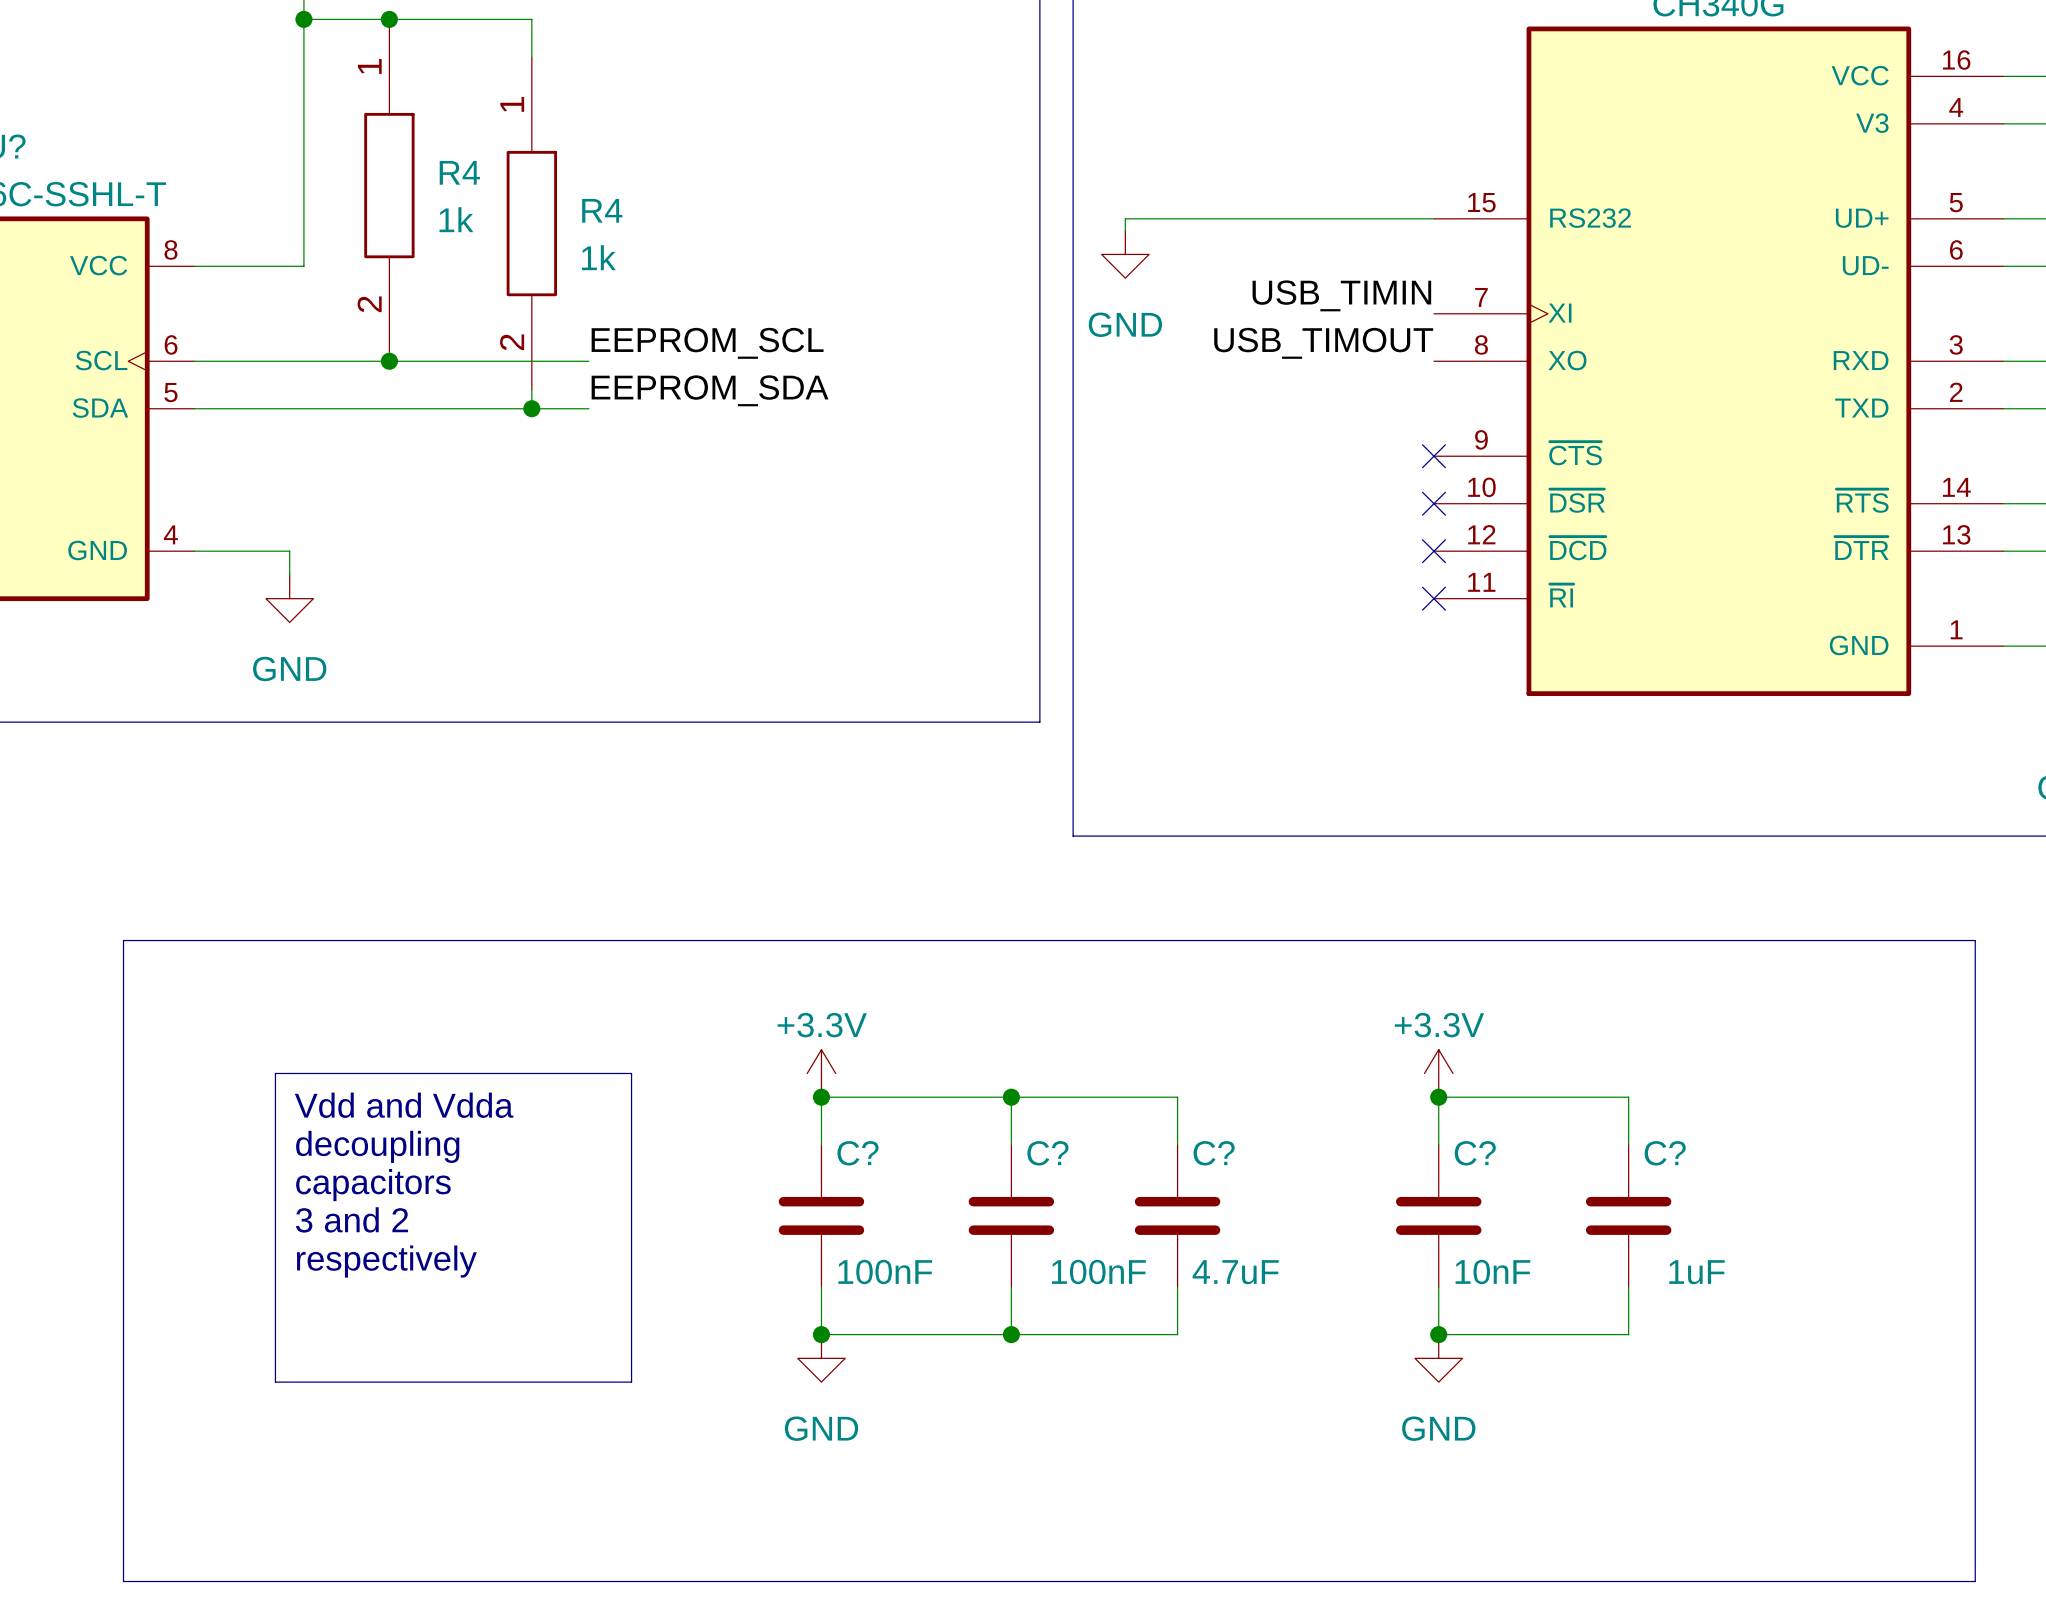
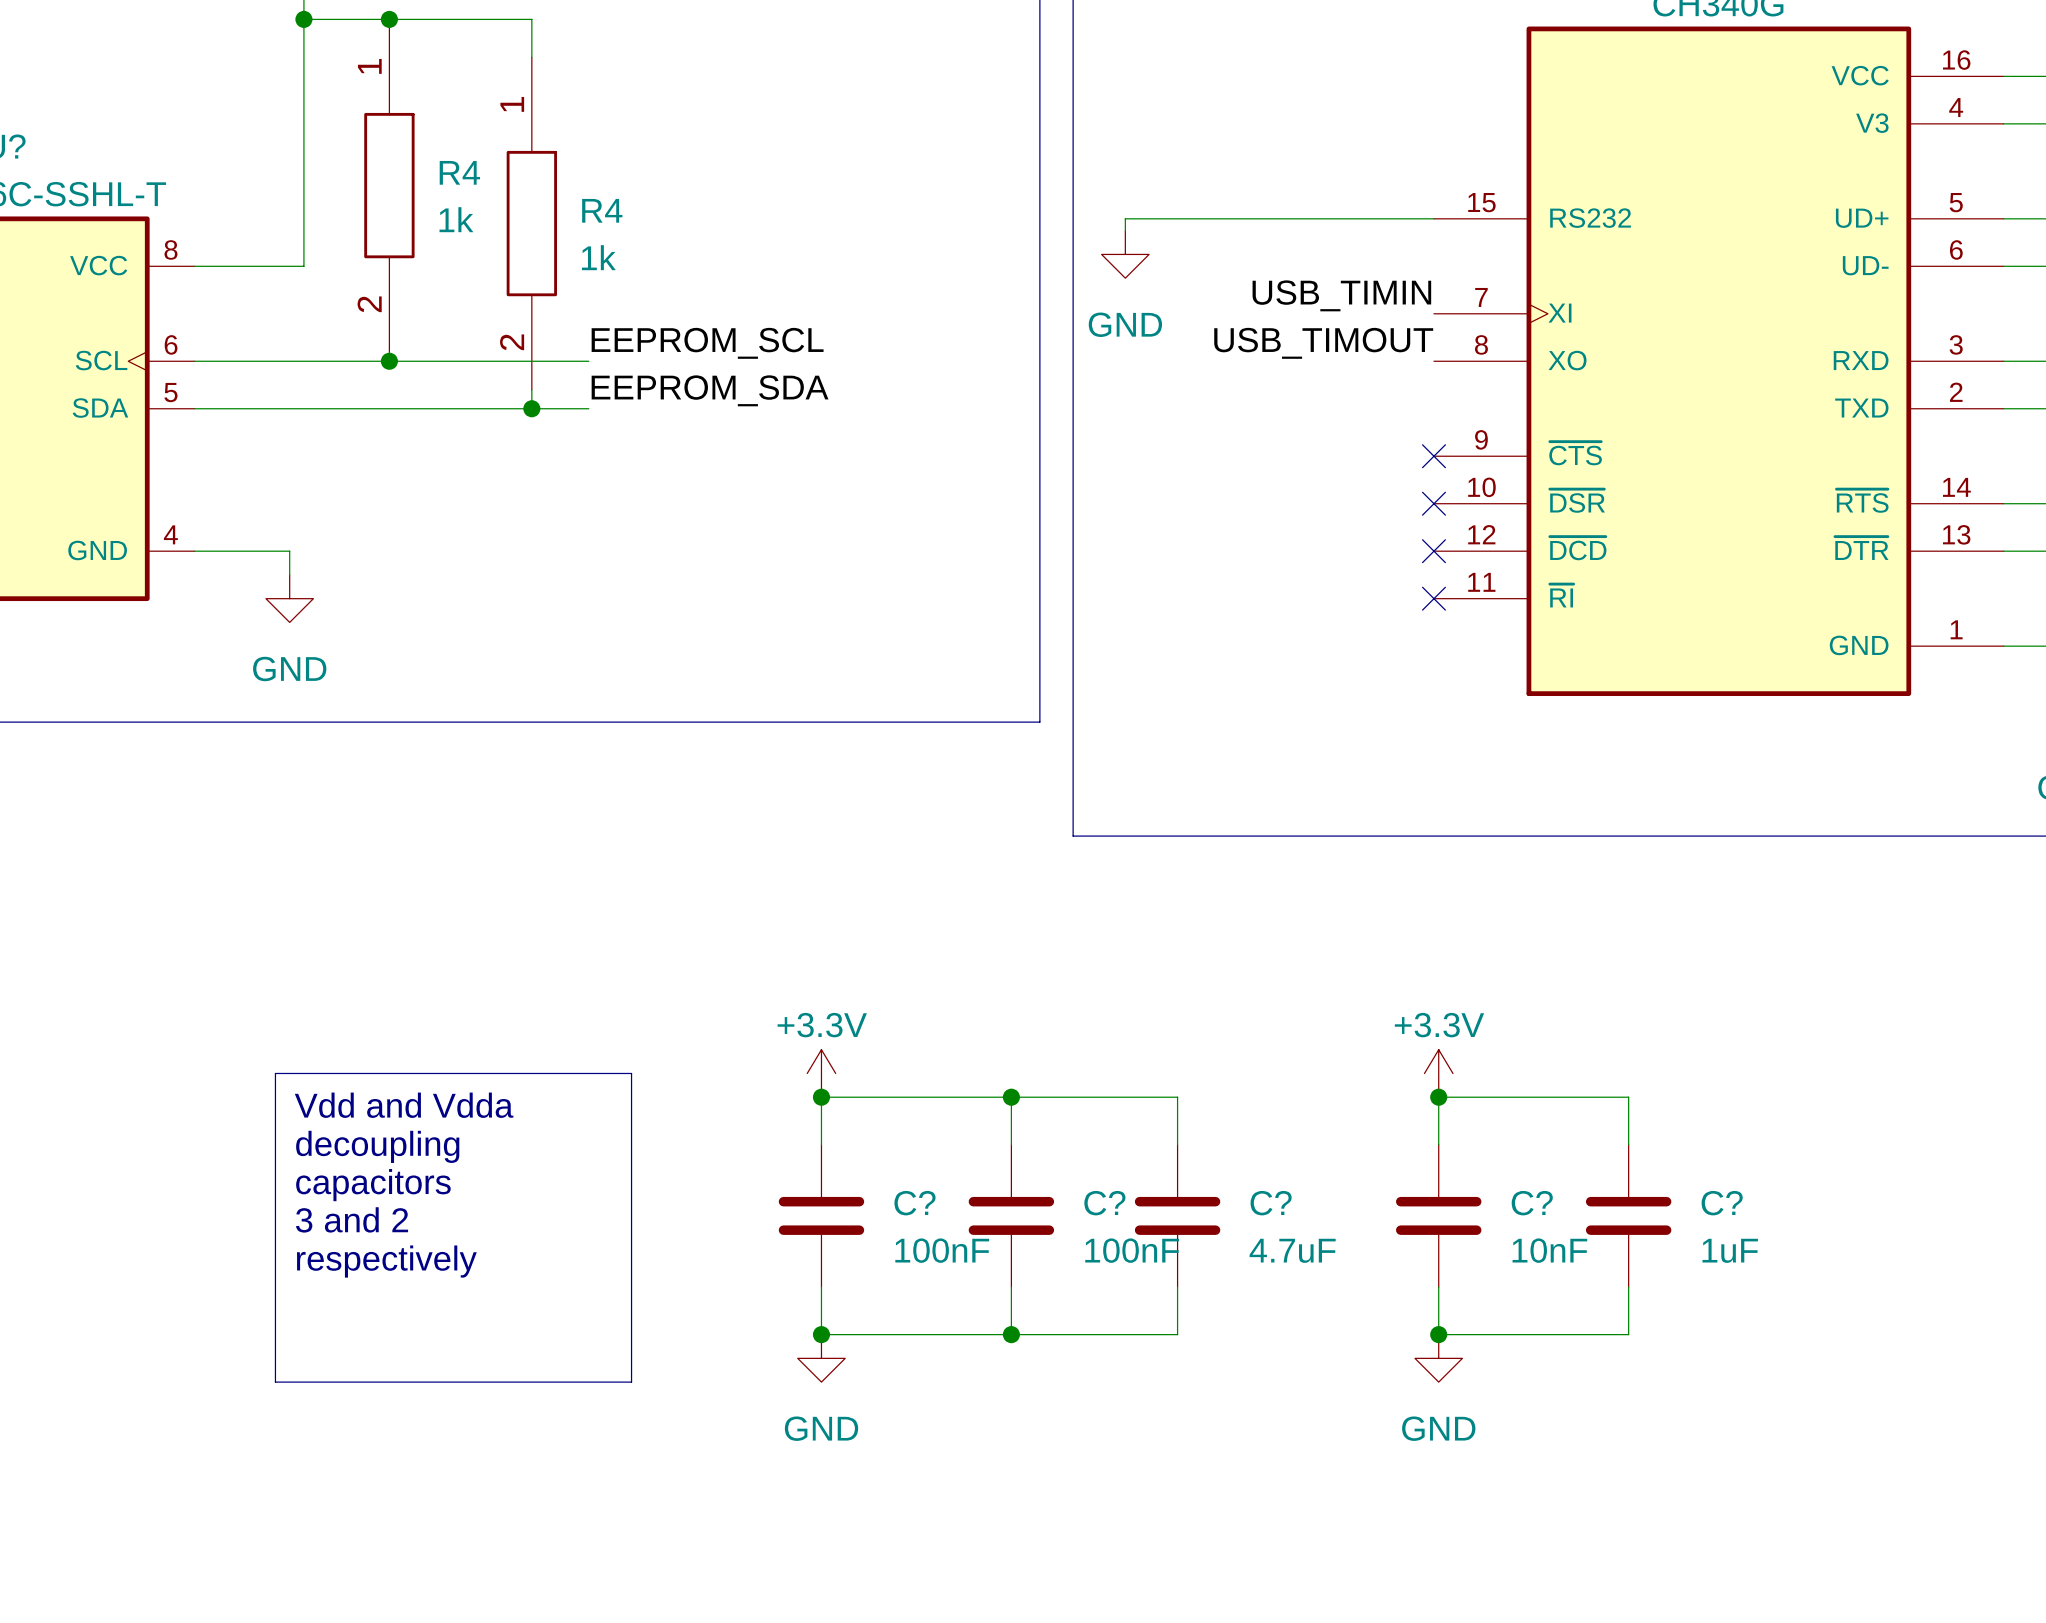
line: (123, 940) (1975, 940) (1975, 1581) (123, 1581) (123, 940) -> none
C? name position: C? (858, 1153) -> C? (914, 1203)
C? name position: C? (1047, 1153) -> C? (1104, 1203)
C? name position: C? (1214, 1153) -> C? (1271, 1203)
C? name position: C? (1475, 1153) -> C? (1532, 1203)
C? name position: C? (1665, 1153) -> C? (1722, 1203)
C? value position: 100nF (885, 1272) -> 100nF (942, 1250)
C? value position: 100nF (1098, 1272) -> 100nF (1132, 1250)
C? value position: 4.7uF (1235, 1272) -> 4.7uF (1292, 1250)
C? value position: 10nF (1492, 1272) -> 10nF (1549, 1250)
C? value position: 1uF (1696, 1272) -> 1uF (1730, 1250)

